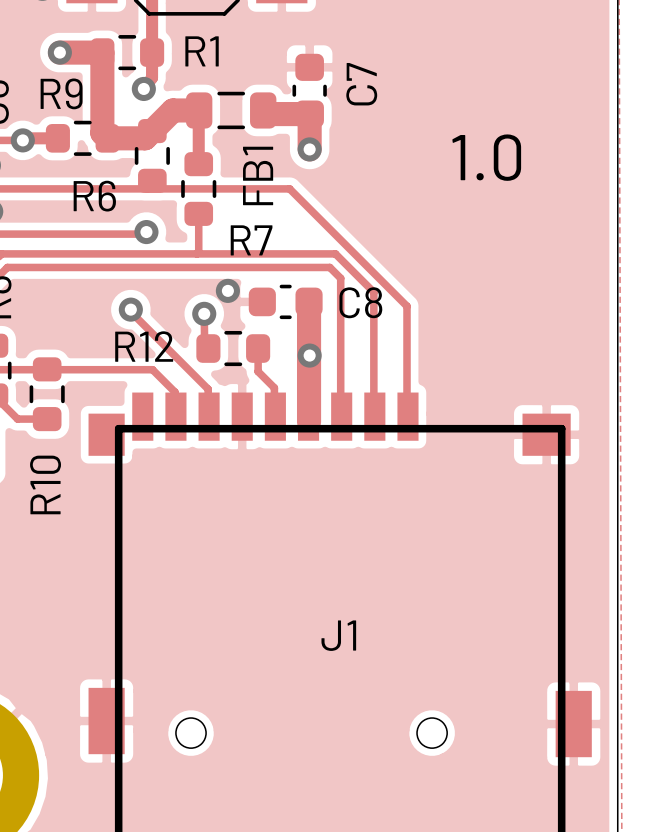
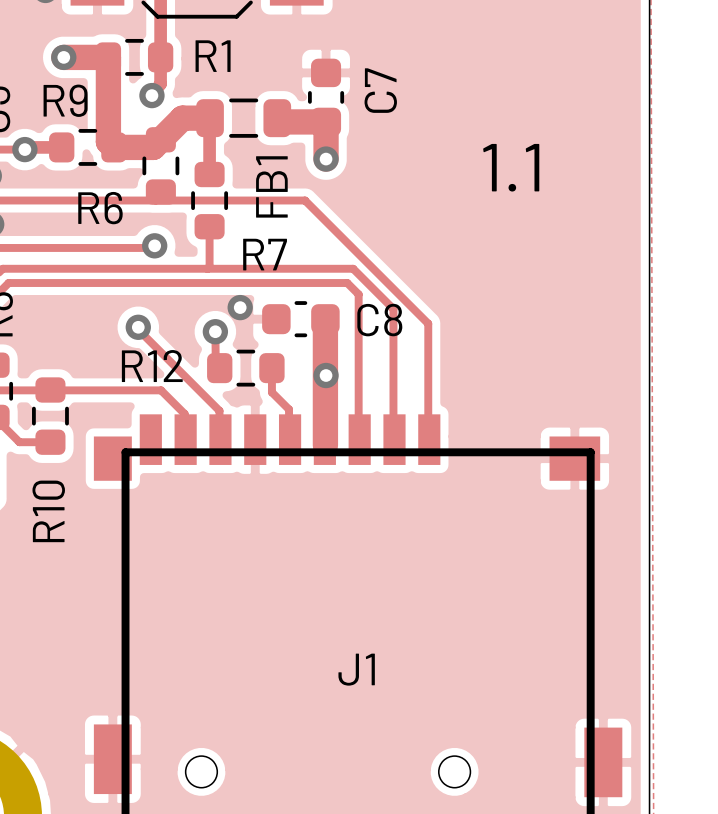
text: 1.0 (486, 157) -> 1.1 (511, 167)

